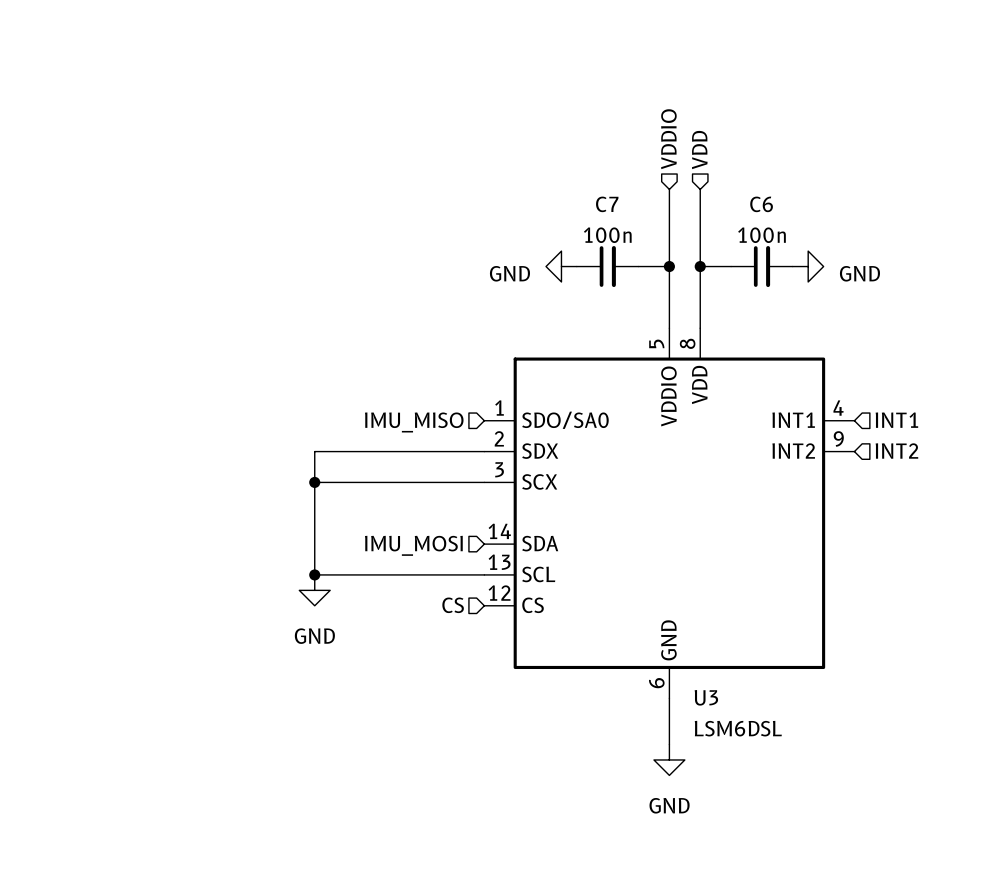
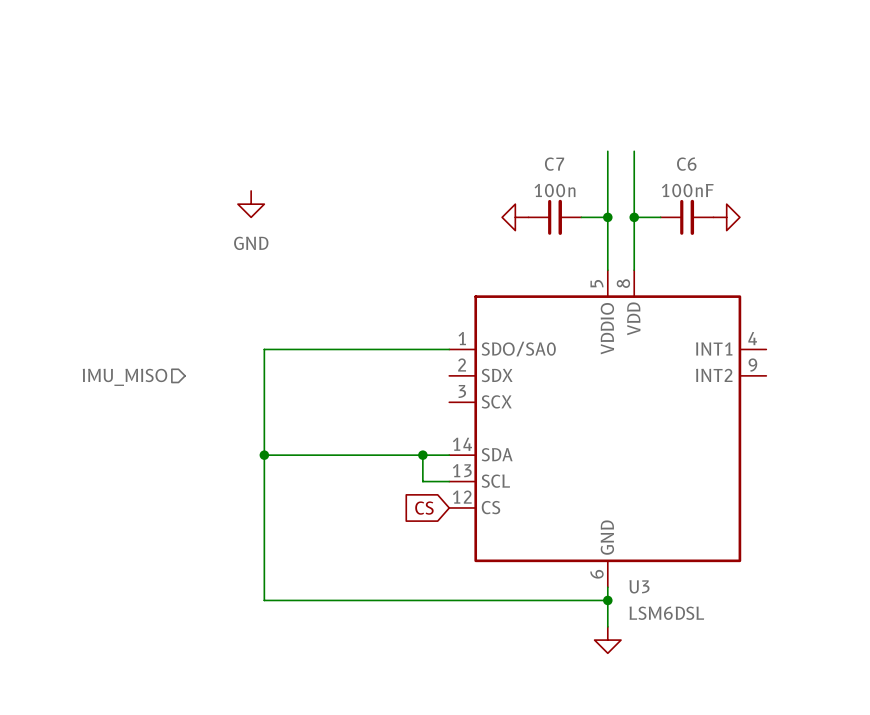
hierarchical label: VDDIO (668, 139) -> none
hierarchical label: VDD (699, 150) -> none
C6 value: 100n (761, 235) -> 100nF (687, 190)
power symbol: none -> GND (251, 204)
power symbol text: GND (509, 273) -> none
power symbol text: GND (859, 273) -> none
wire: none -> (449, 349) (264, 349) (264, 600) (607, 600)
hierarchical label: INT1 (896, 420) -> none
hierarchical label: IMU_MISO (414, 422) -> none
wire: (484, 451) (314, 451) (314, 574) (453, 574) -> (422, 455) (422, 481)
hierarchical label: INT2 (896, 451) -> none
hierarchical label: none -> IMU_MISO (125, 377)
wire: (314, 482) (484, 482) -> none
junction: (314, 482) -> none
wire: none -> (264, 455) (449, 455)
junction: none -> (264, 455)
junction: none -> (422, 455)
hierarchical label: IMU_MOSI (413, 545) -> none
junction: (314, 574) -> none
power symbol: GND (314, 590) -> none
hierarchical label: CS (453, 605) -> none
global label: none -> CS (424, 508)
junction: none -> (607, 600)
power symbol text: GND (669, 805) -> none

